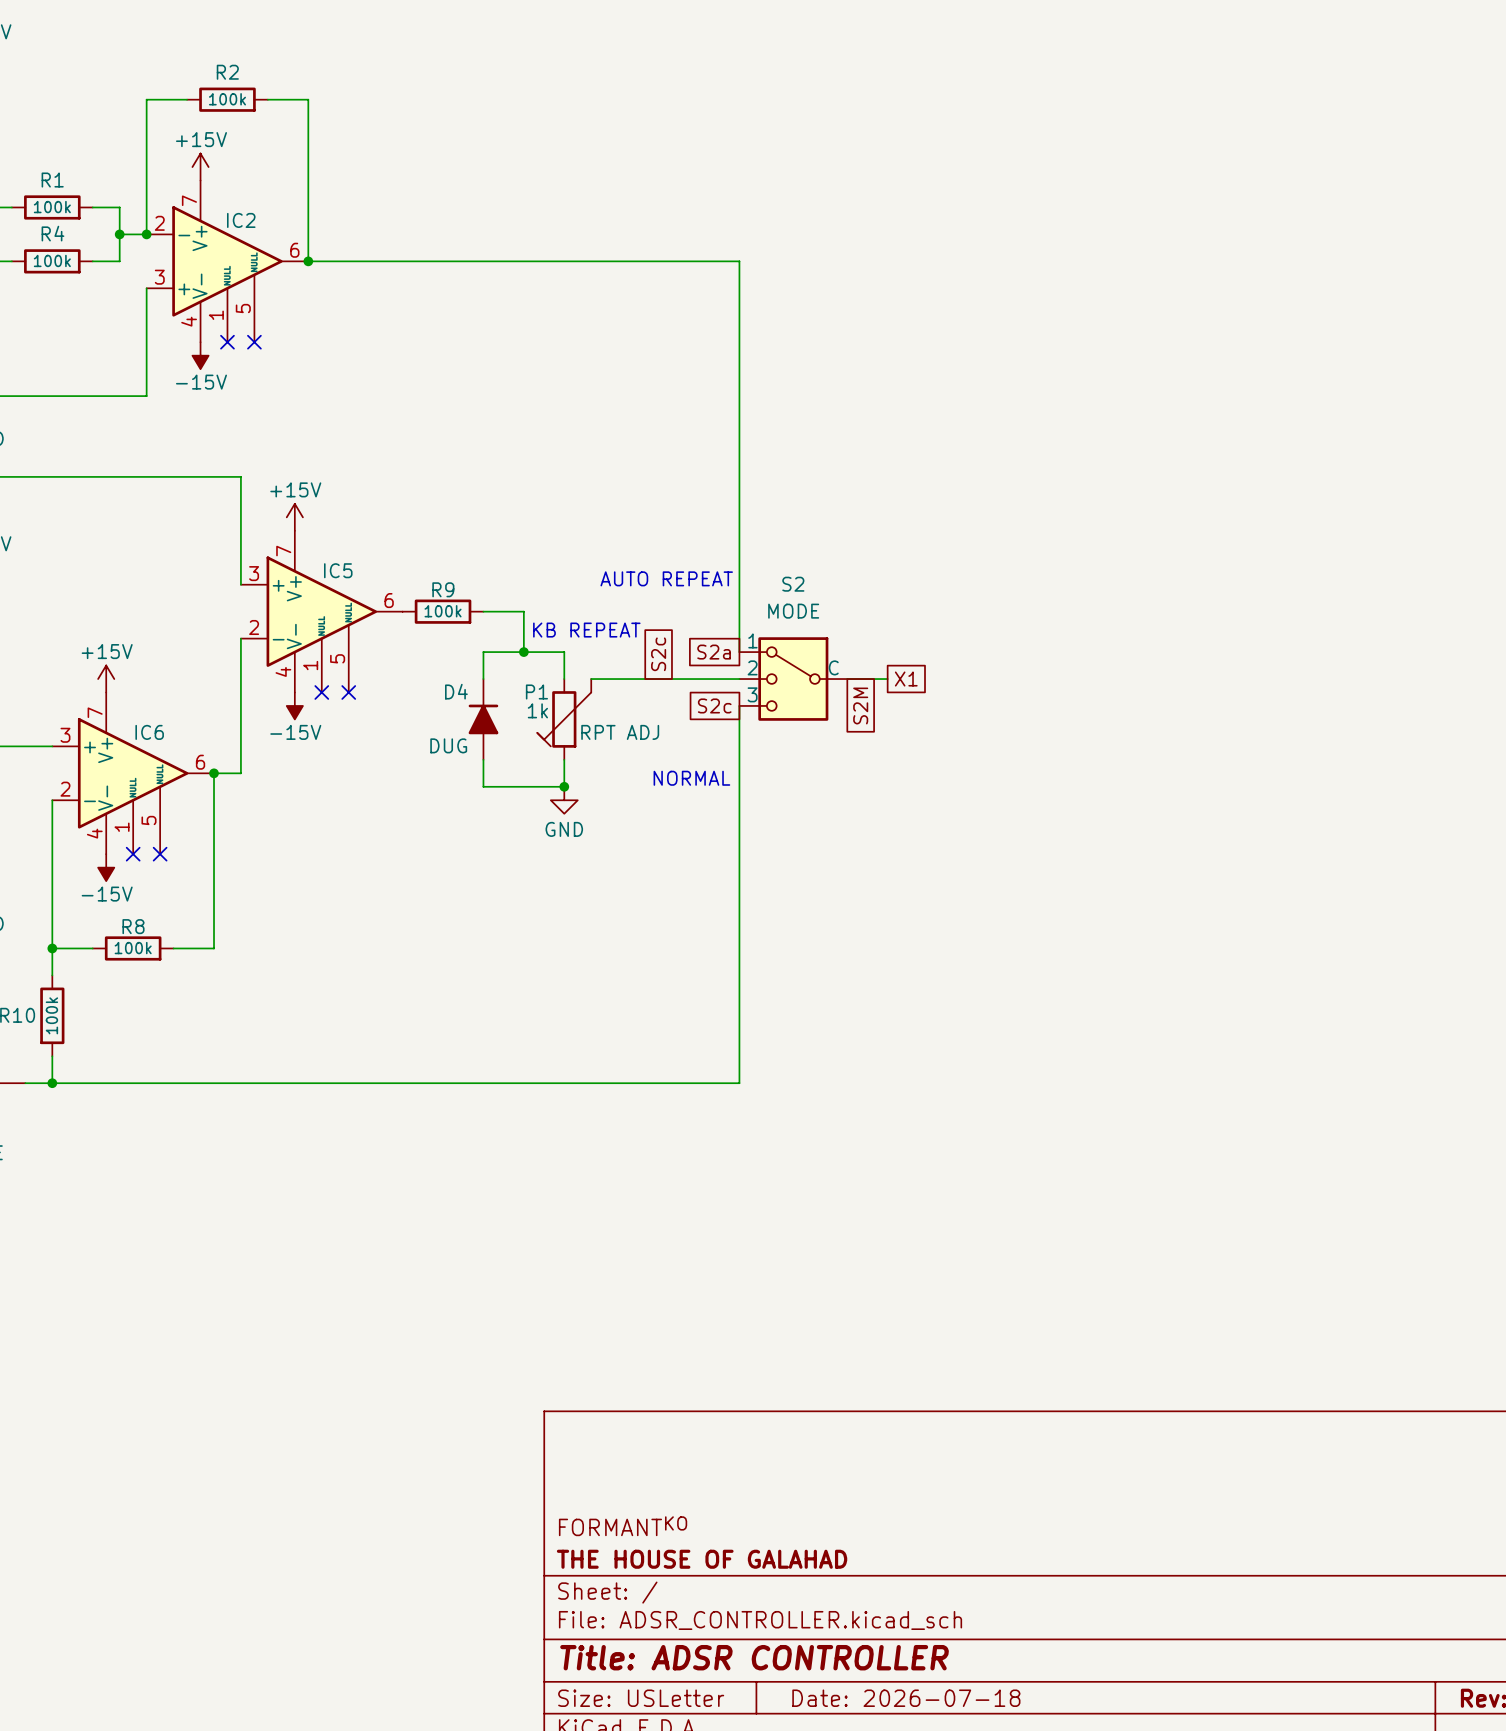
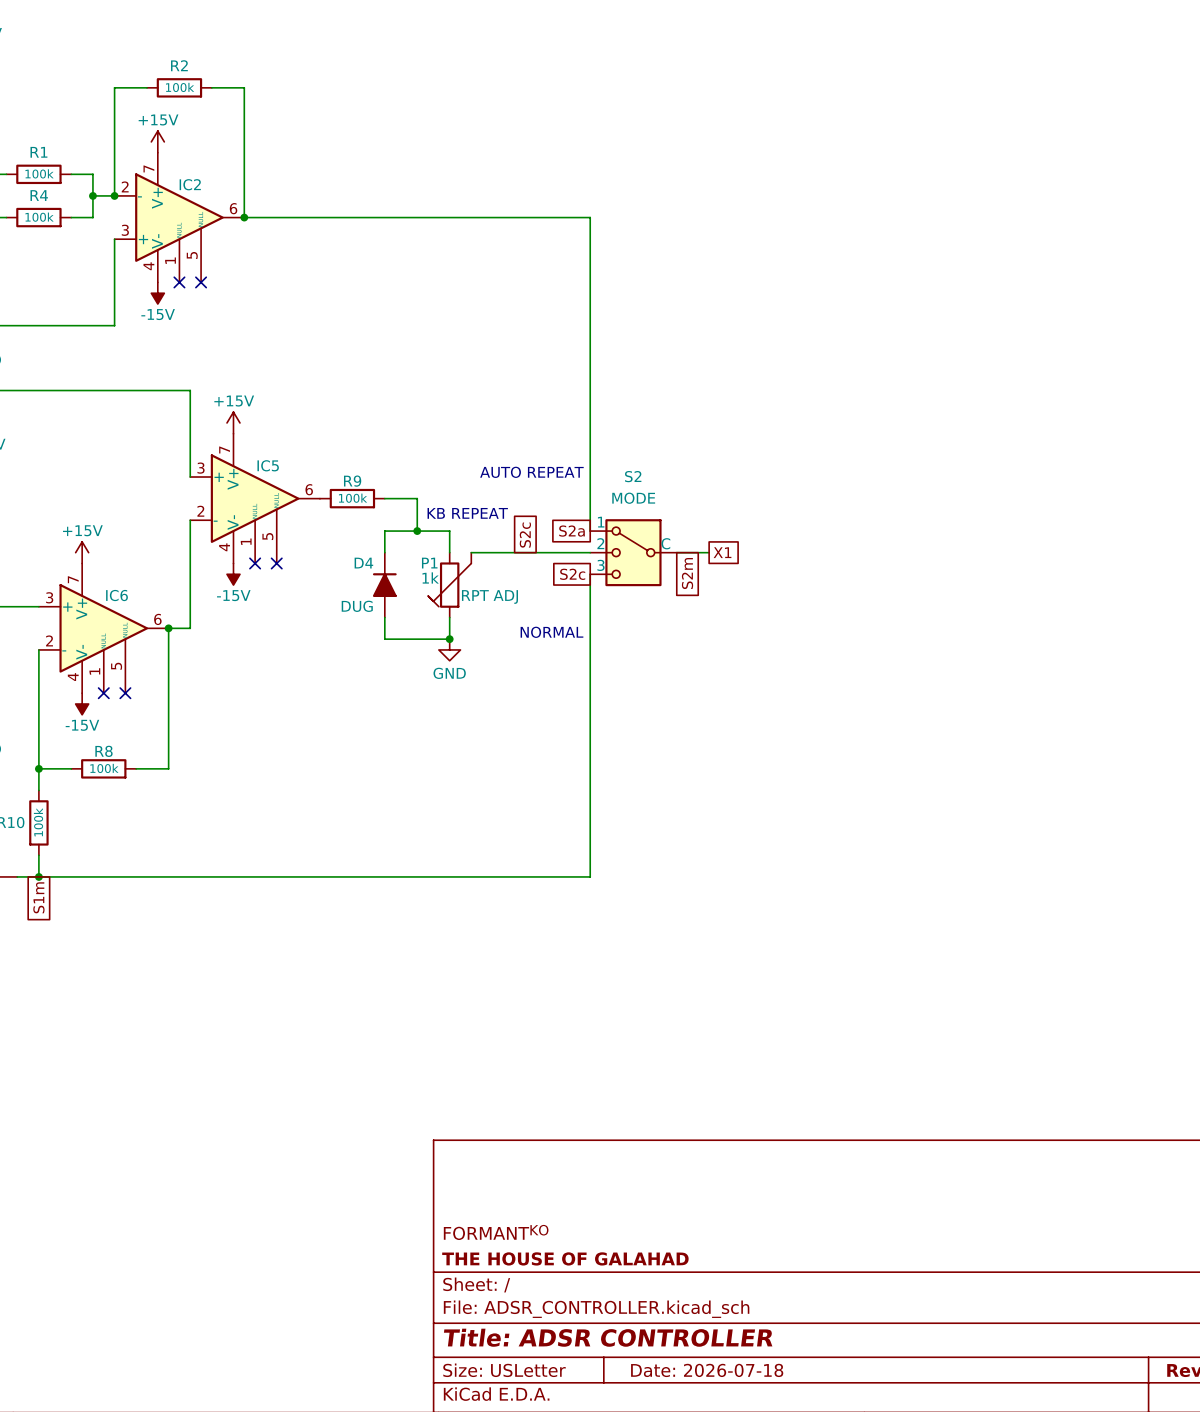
global label: S2M (860, 705) -> S2m (687, 573)
global label: none -> S1m (38, 897)

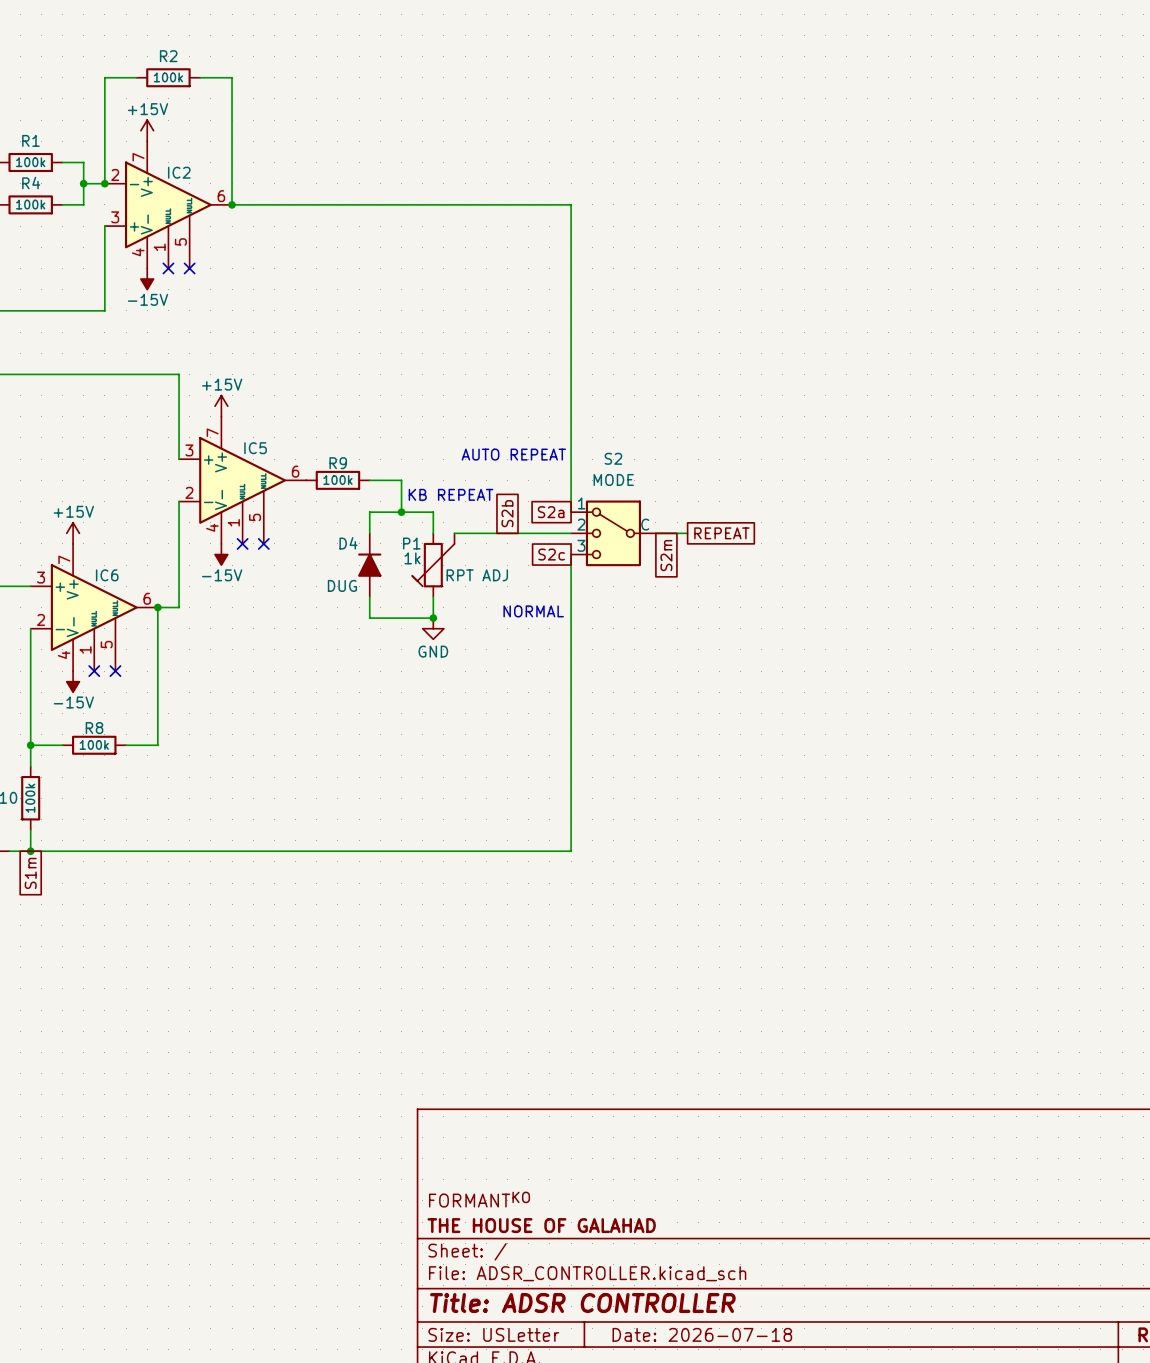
global label: S2c (525, 535) -> S2b (507, 513)
global label: X1 (722, 552) -> REPEAT (721, 533)

